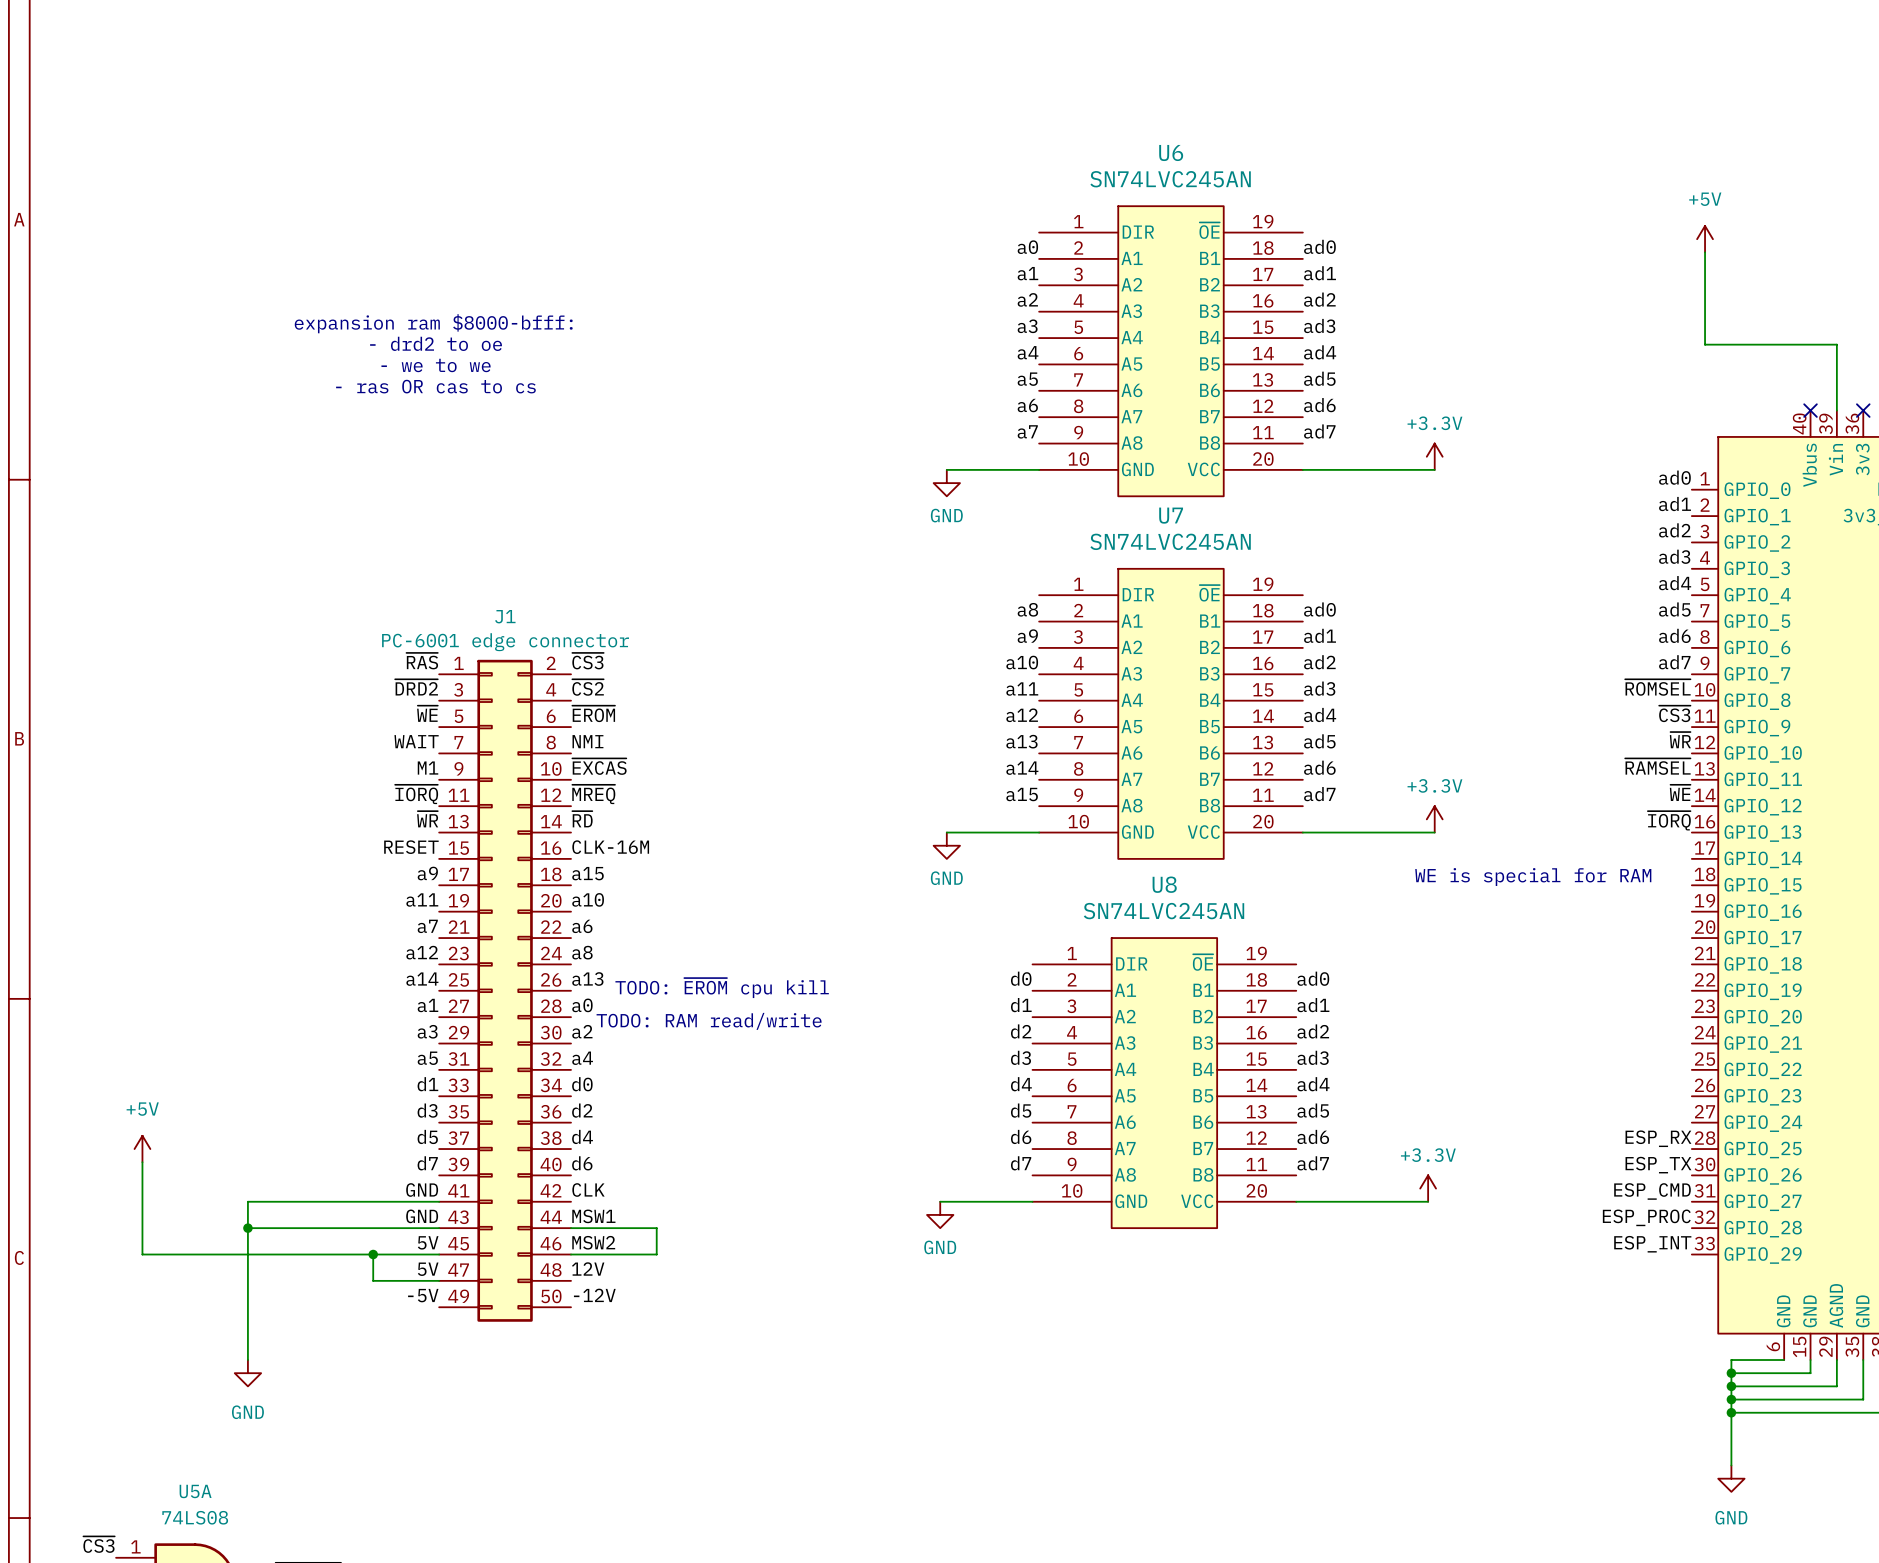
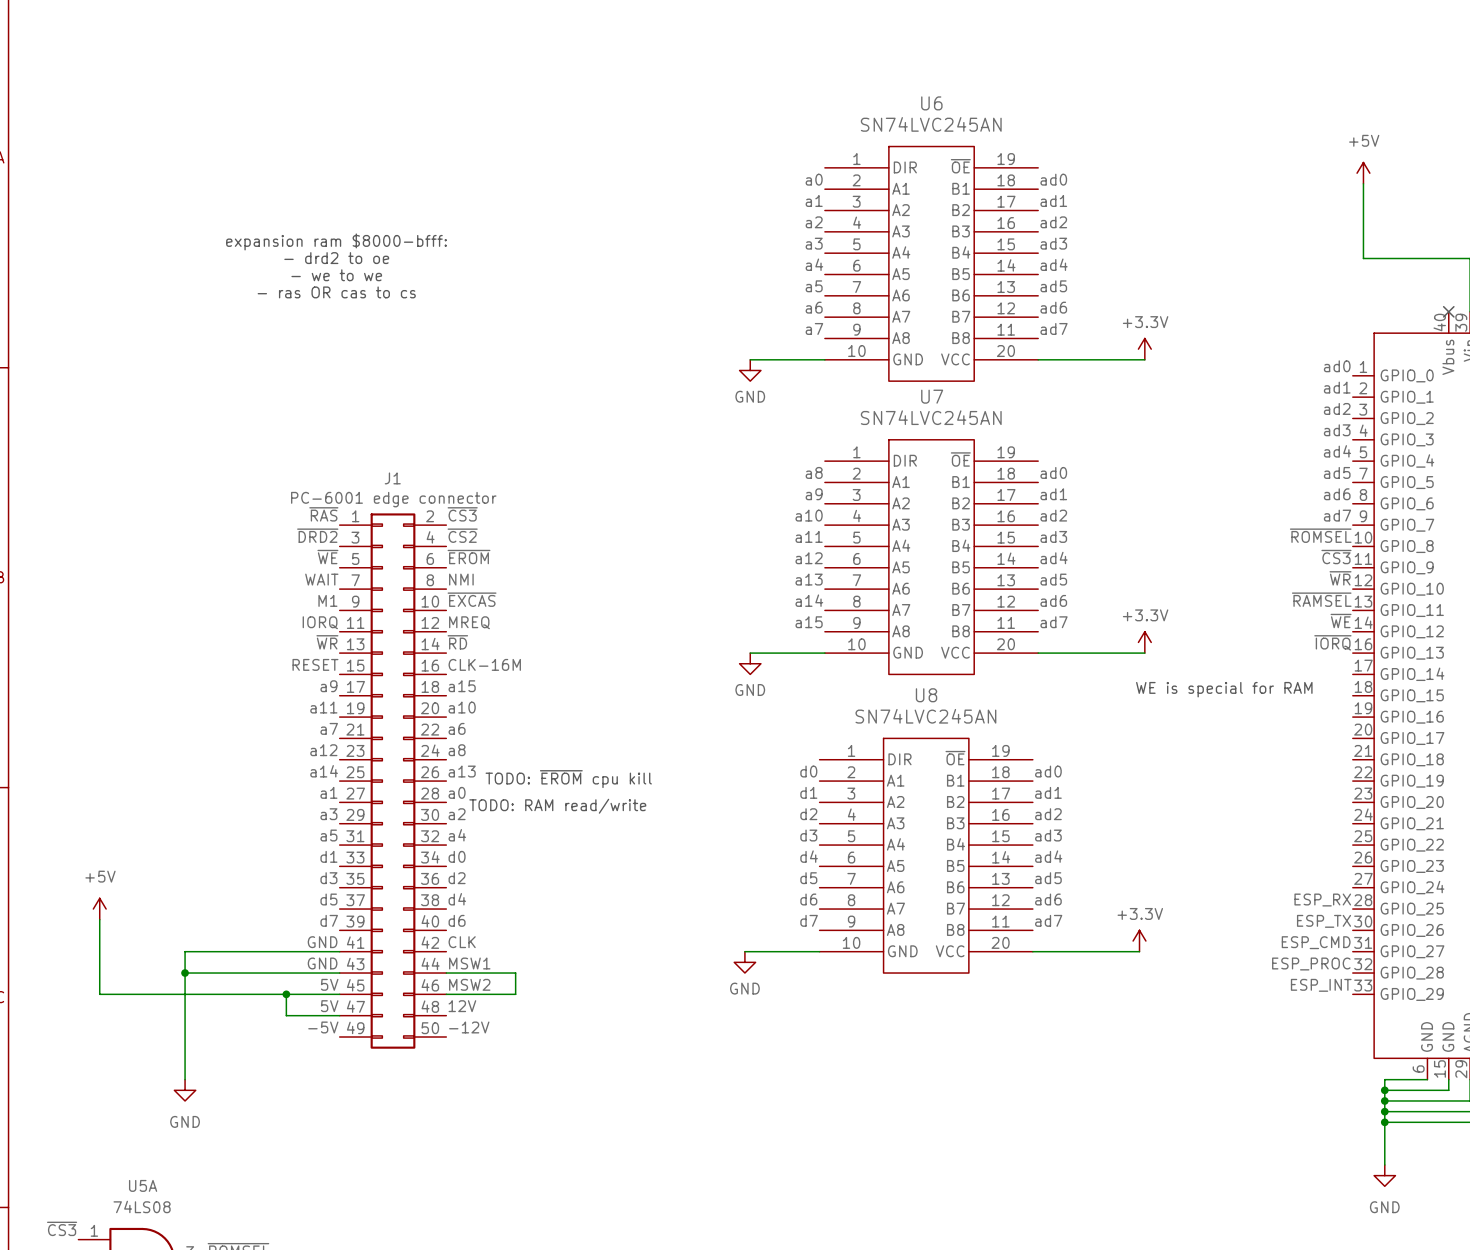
label: ~{IORQ} (416, 794) -> IORQ (320, 622)
label: ~{MREQ} (593, 794) -> MREQ (469, 622)

